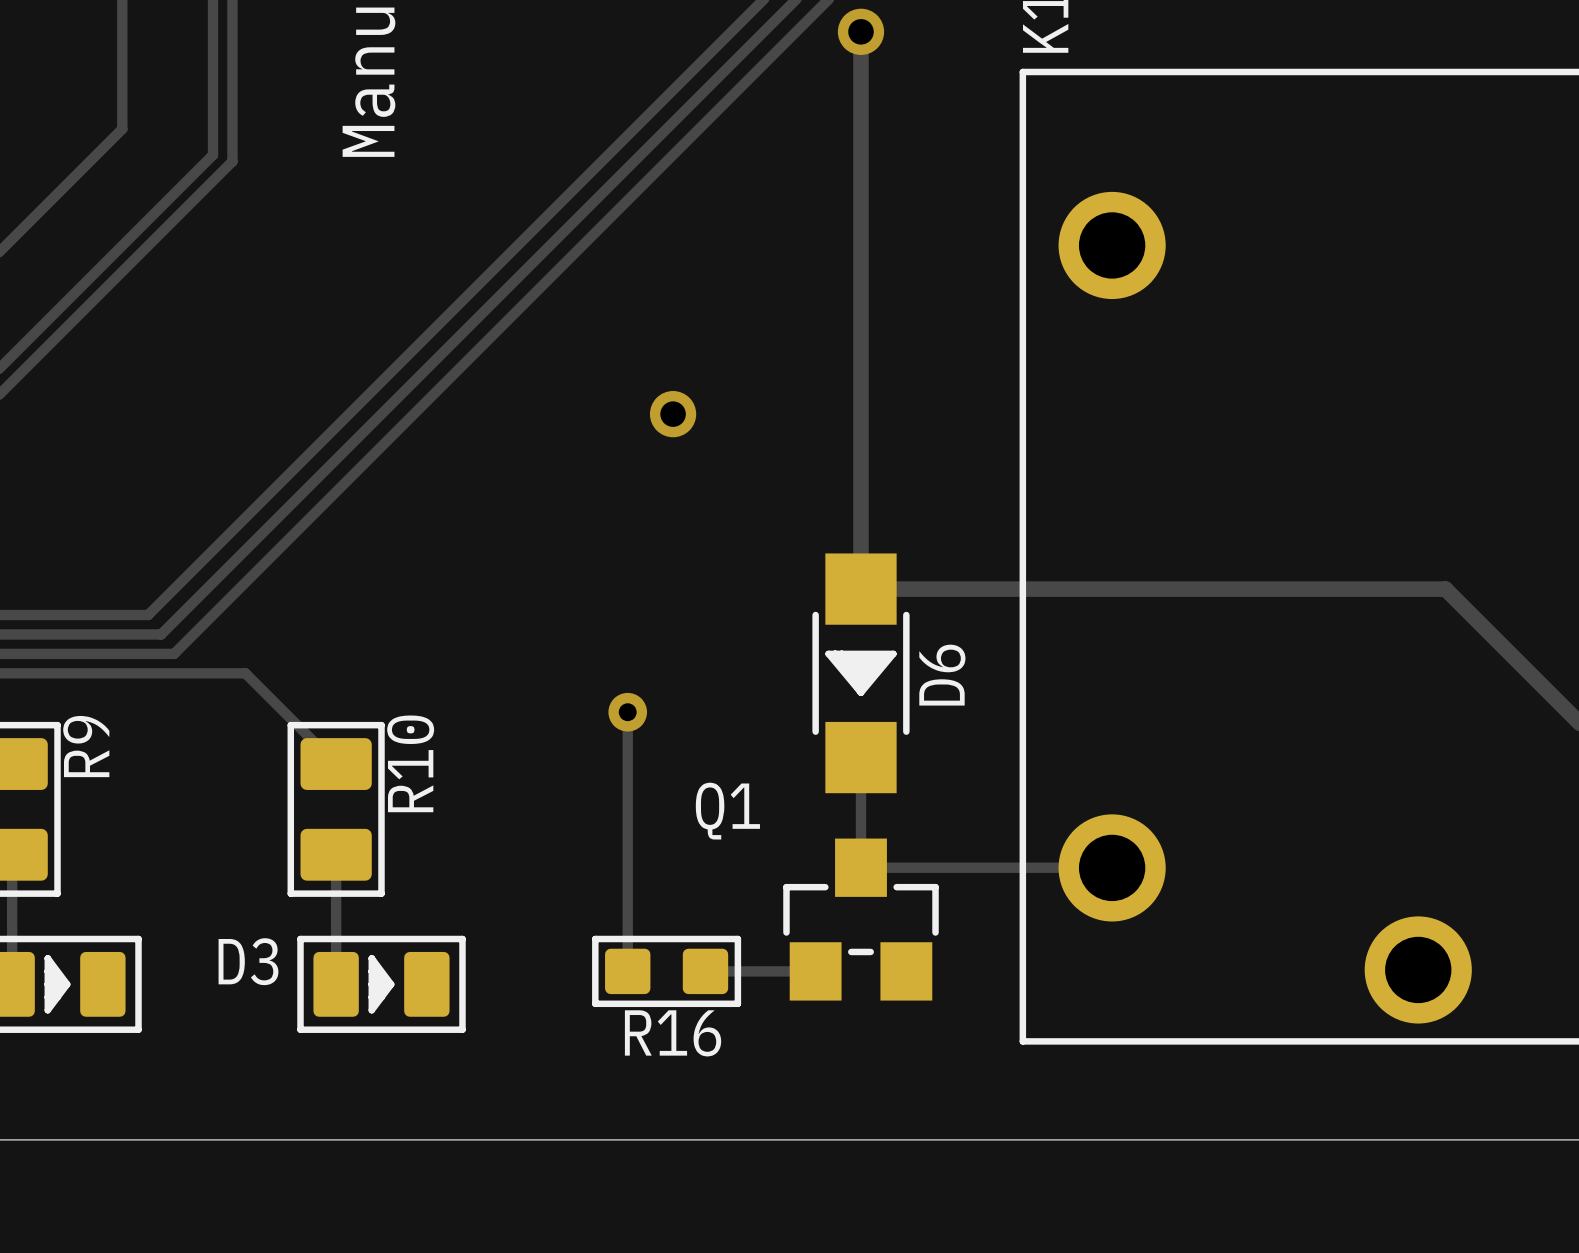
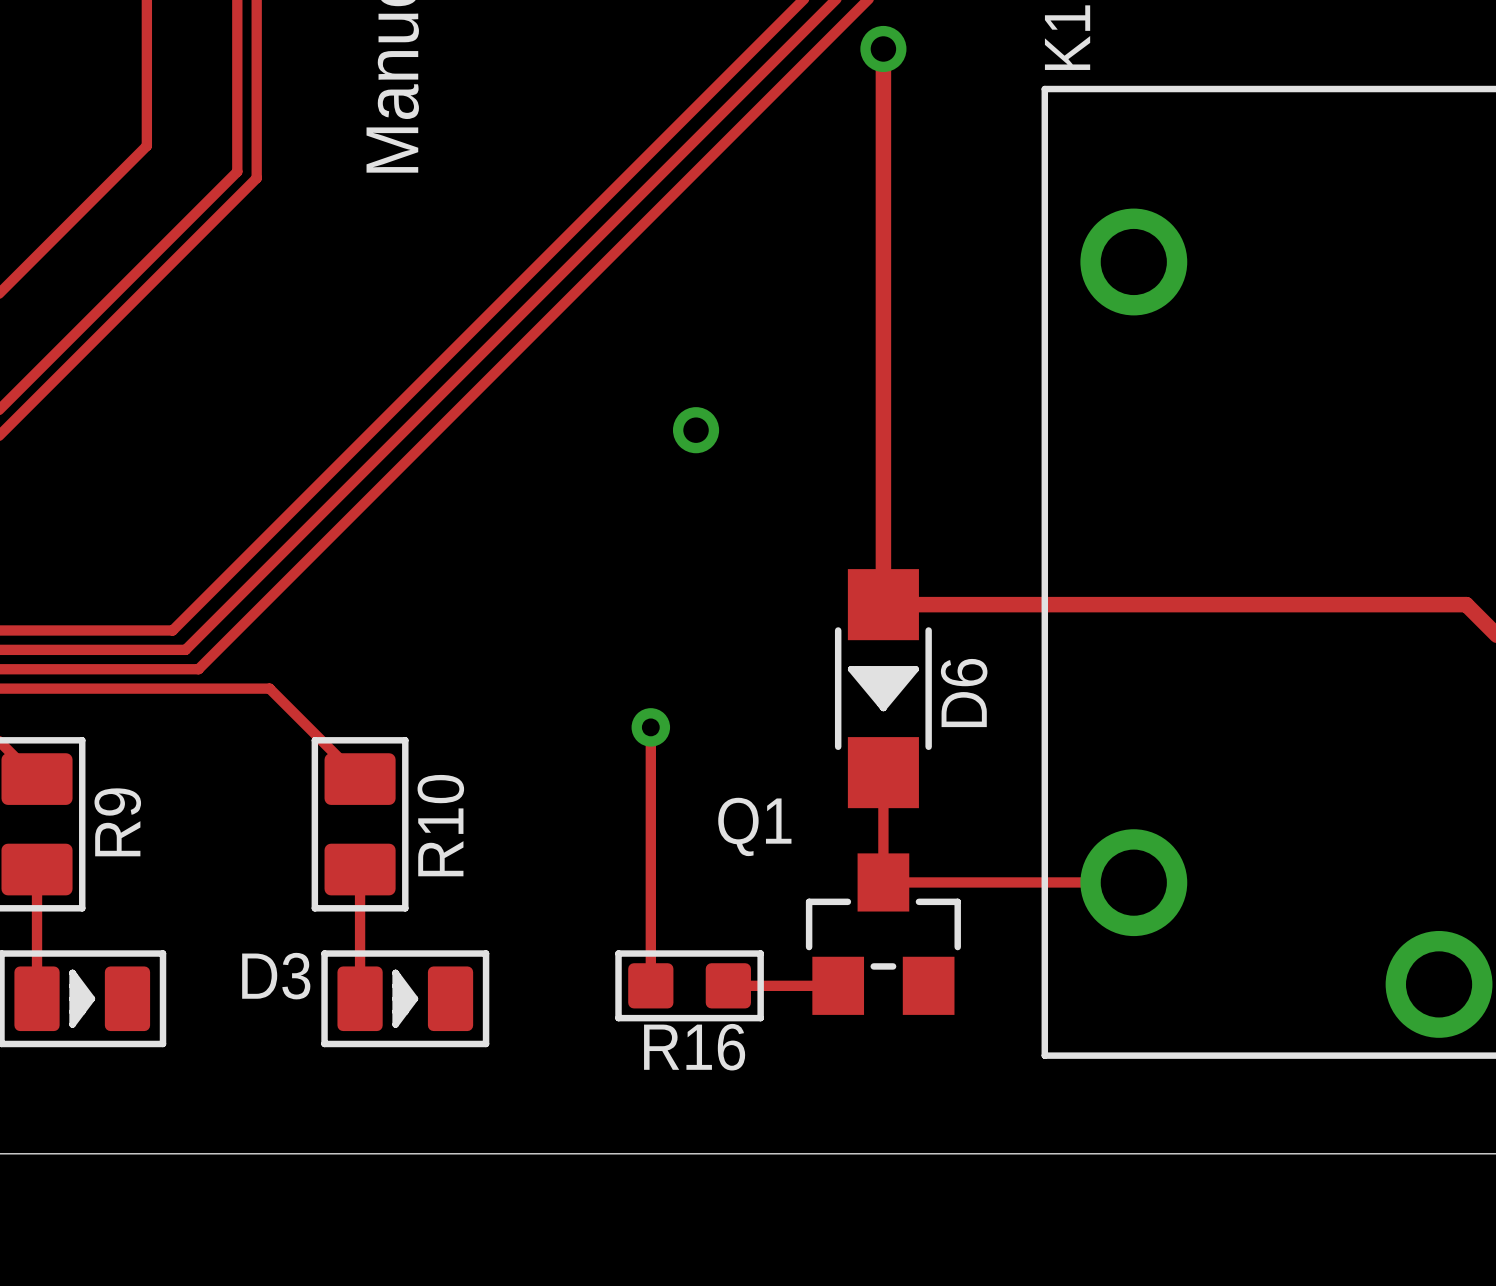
R9 name position: R9 (86, 746) -> R9 (117, 822)
R10 name position: R10 (410, 763) -> R10 (440, 825)

